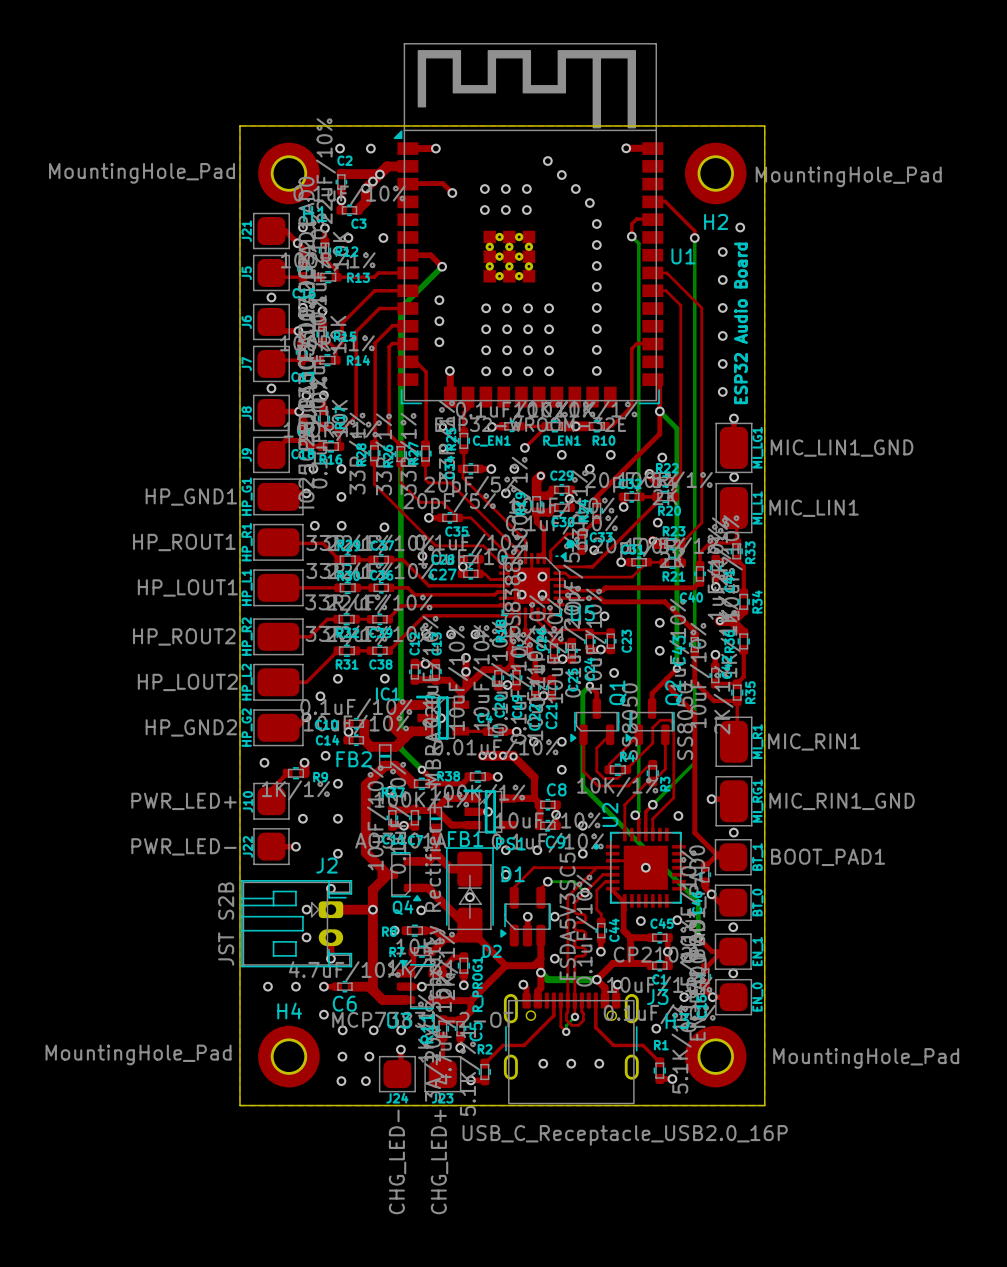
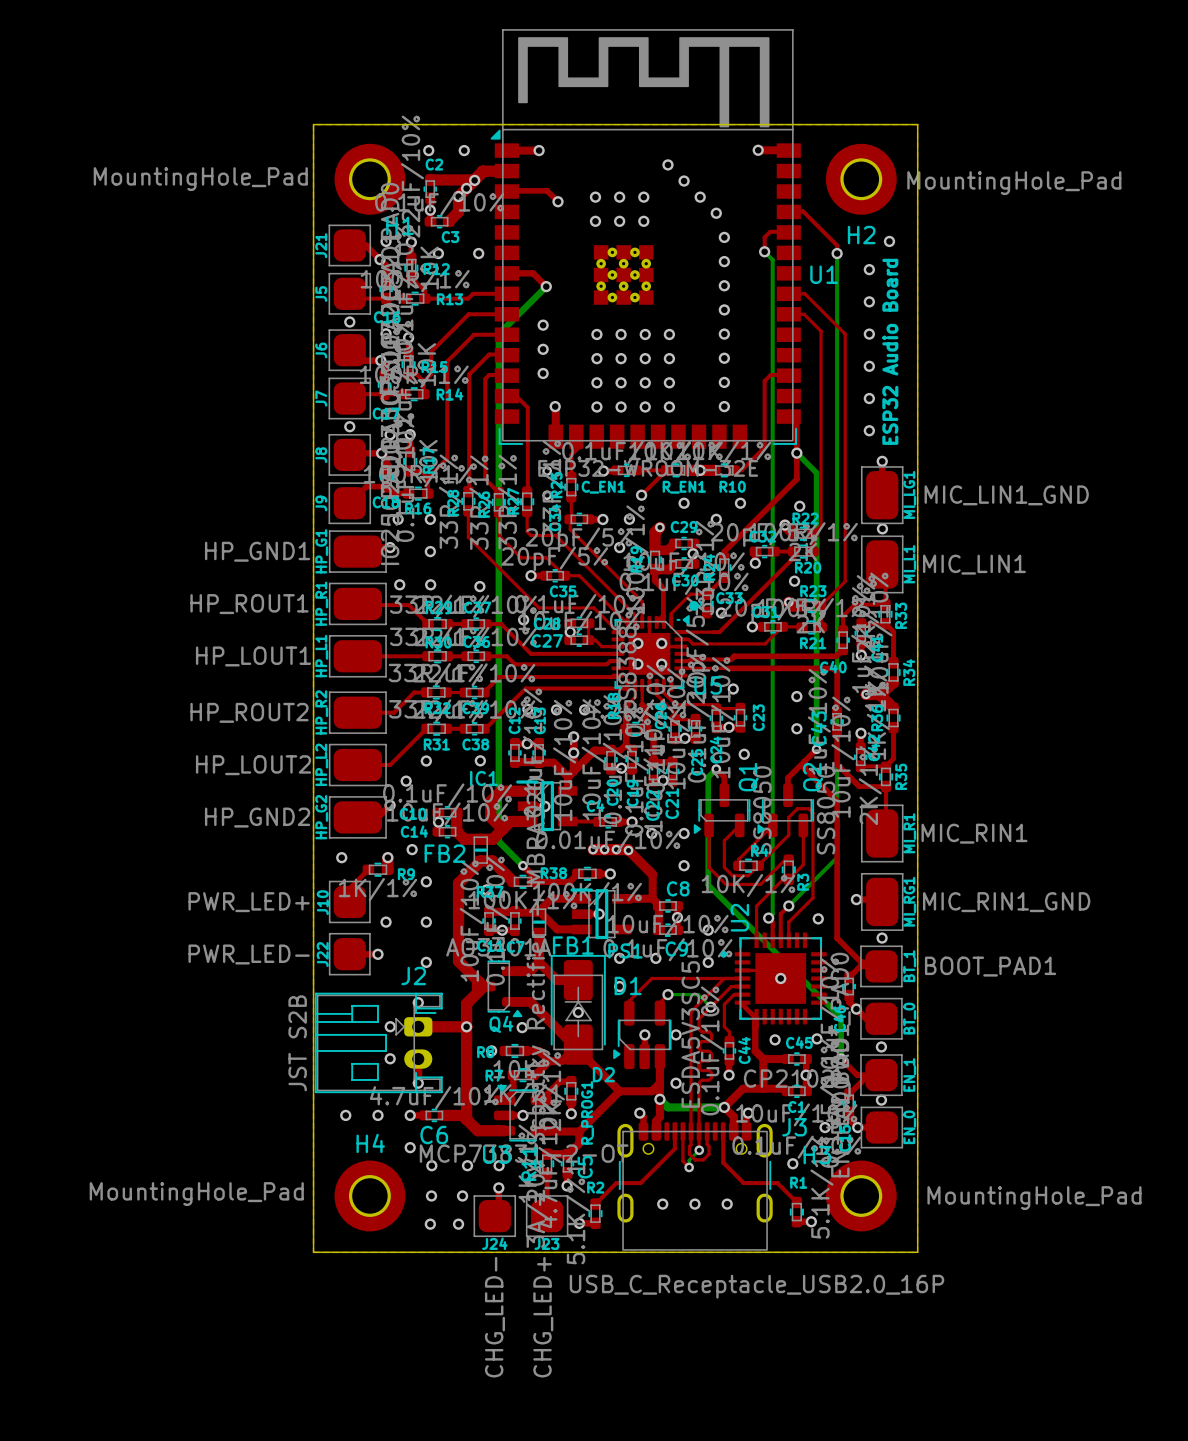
top track: (600, 598) (603, 601) (664, 601) (694, 631) -> (728, 668) (833, 668) (837, 672) (837, 706)

